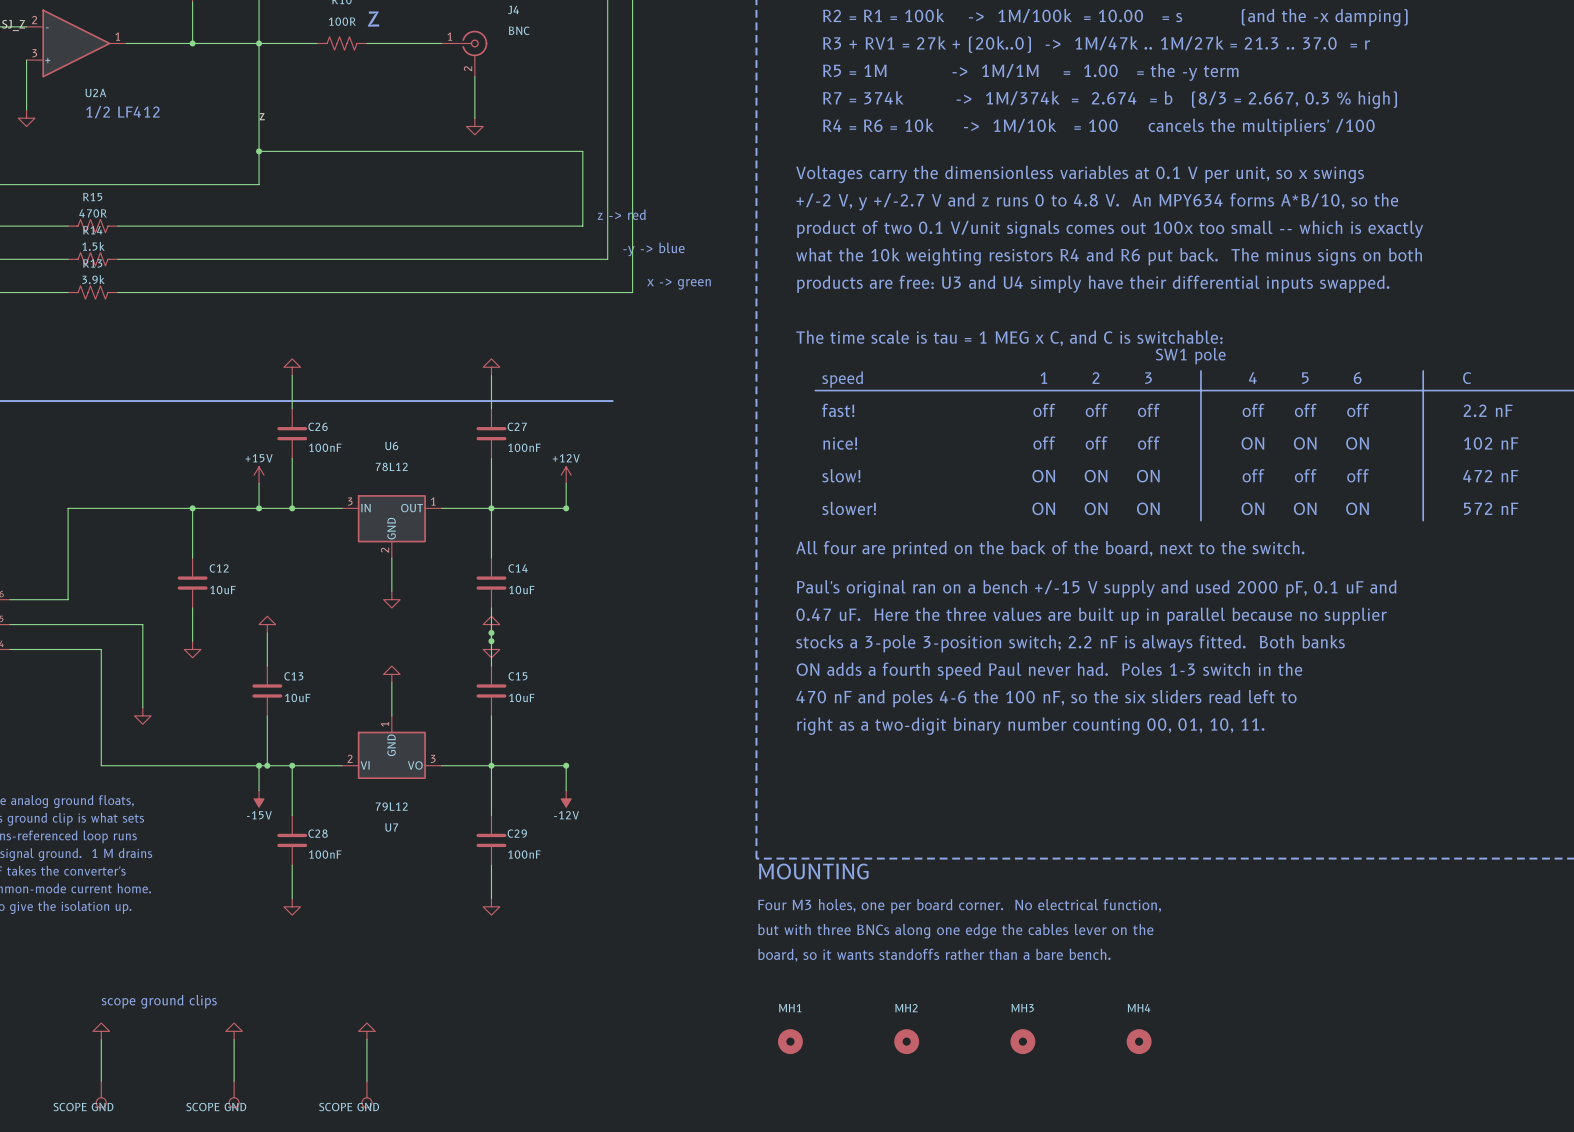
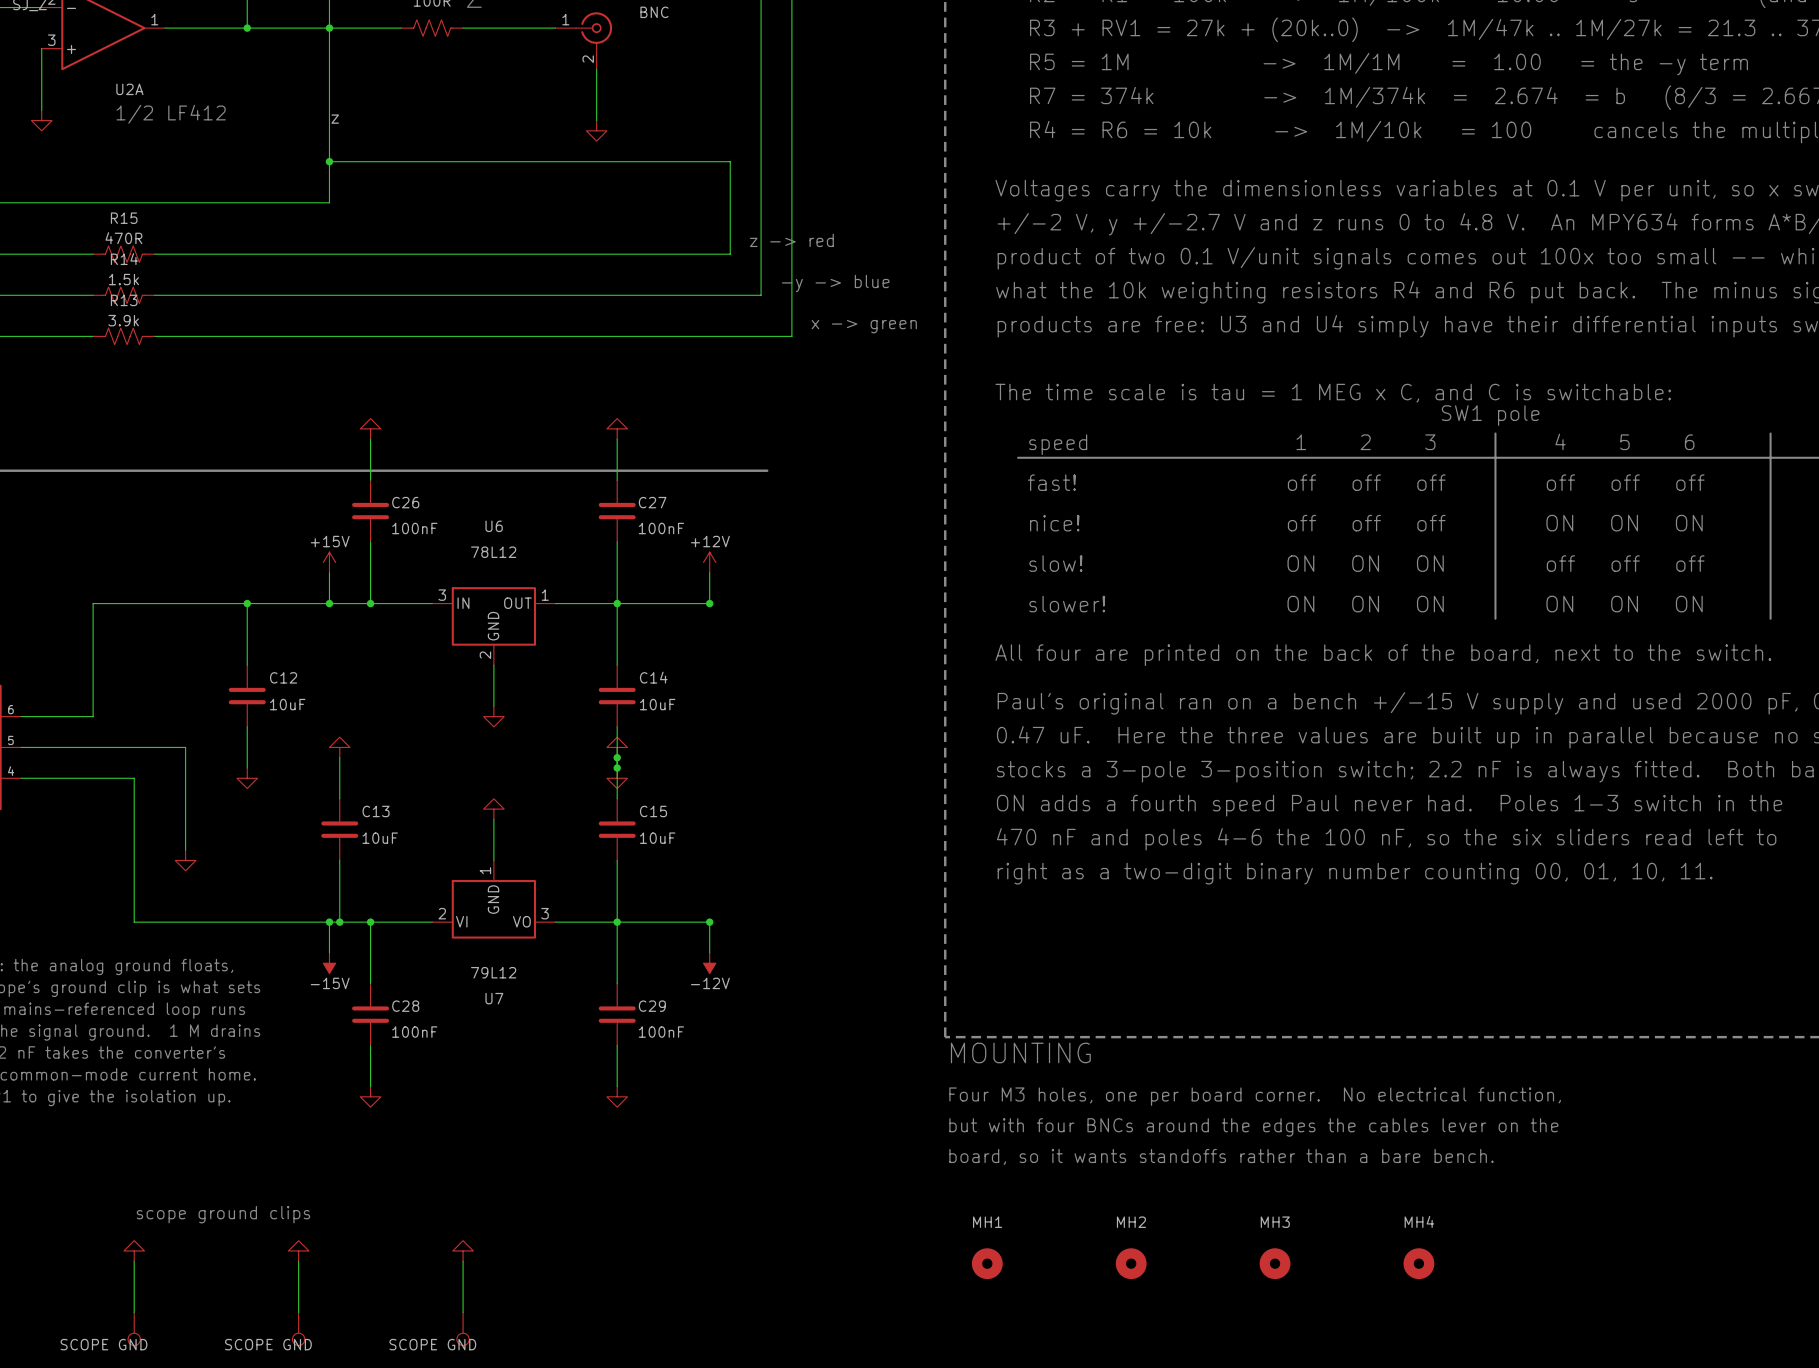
text: but with three BNCs along one edge the cables lever on the (955, 931) -> but with four BNCs around the edges the cables lever on the (1253, 1127)

